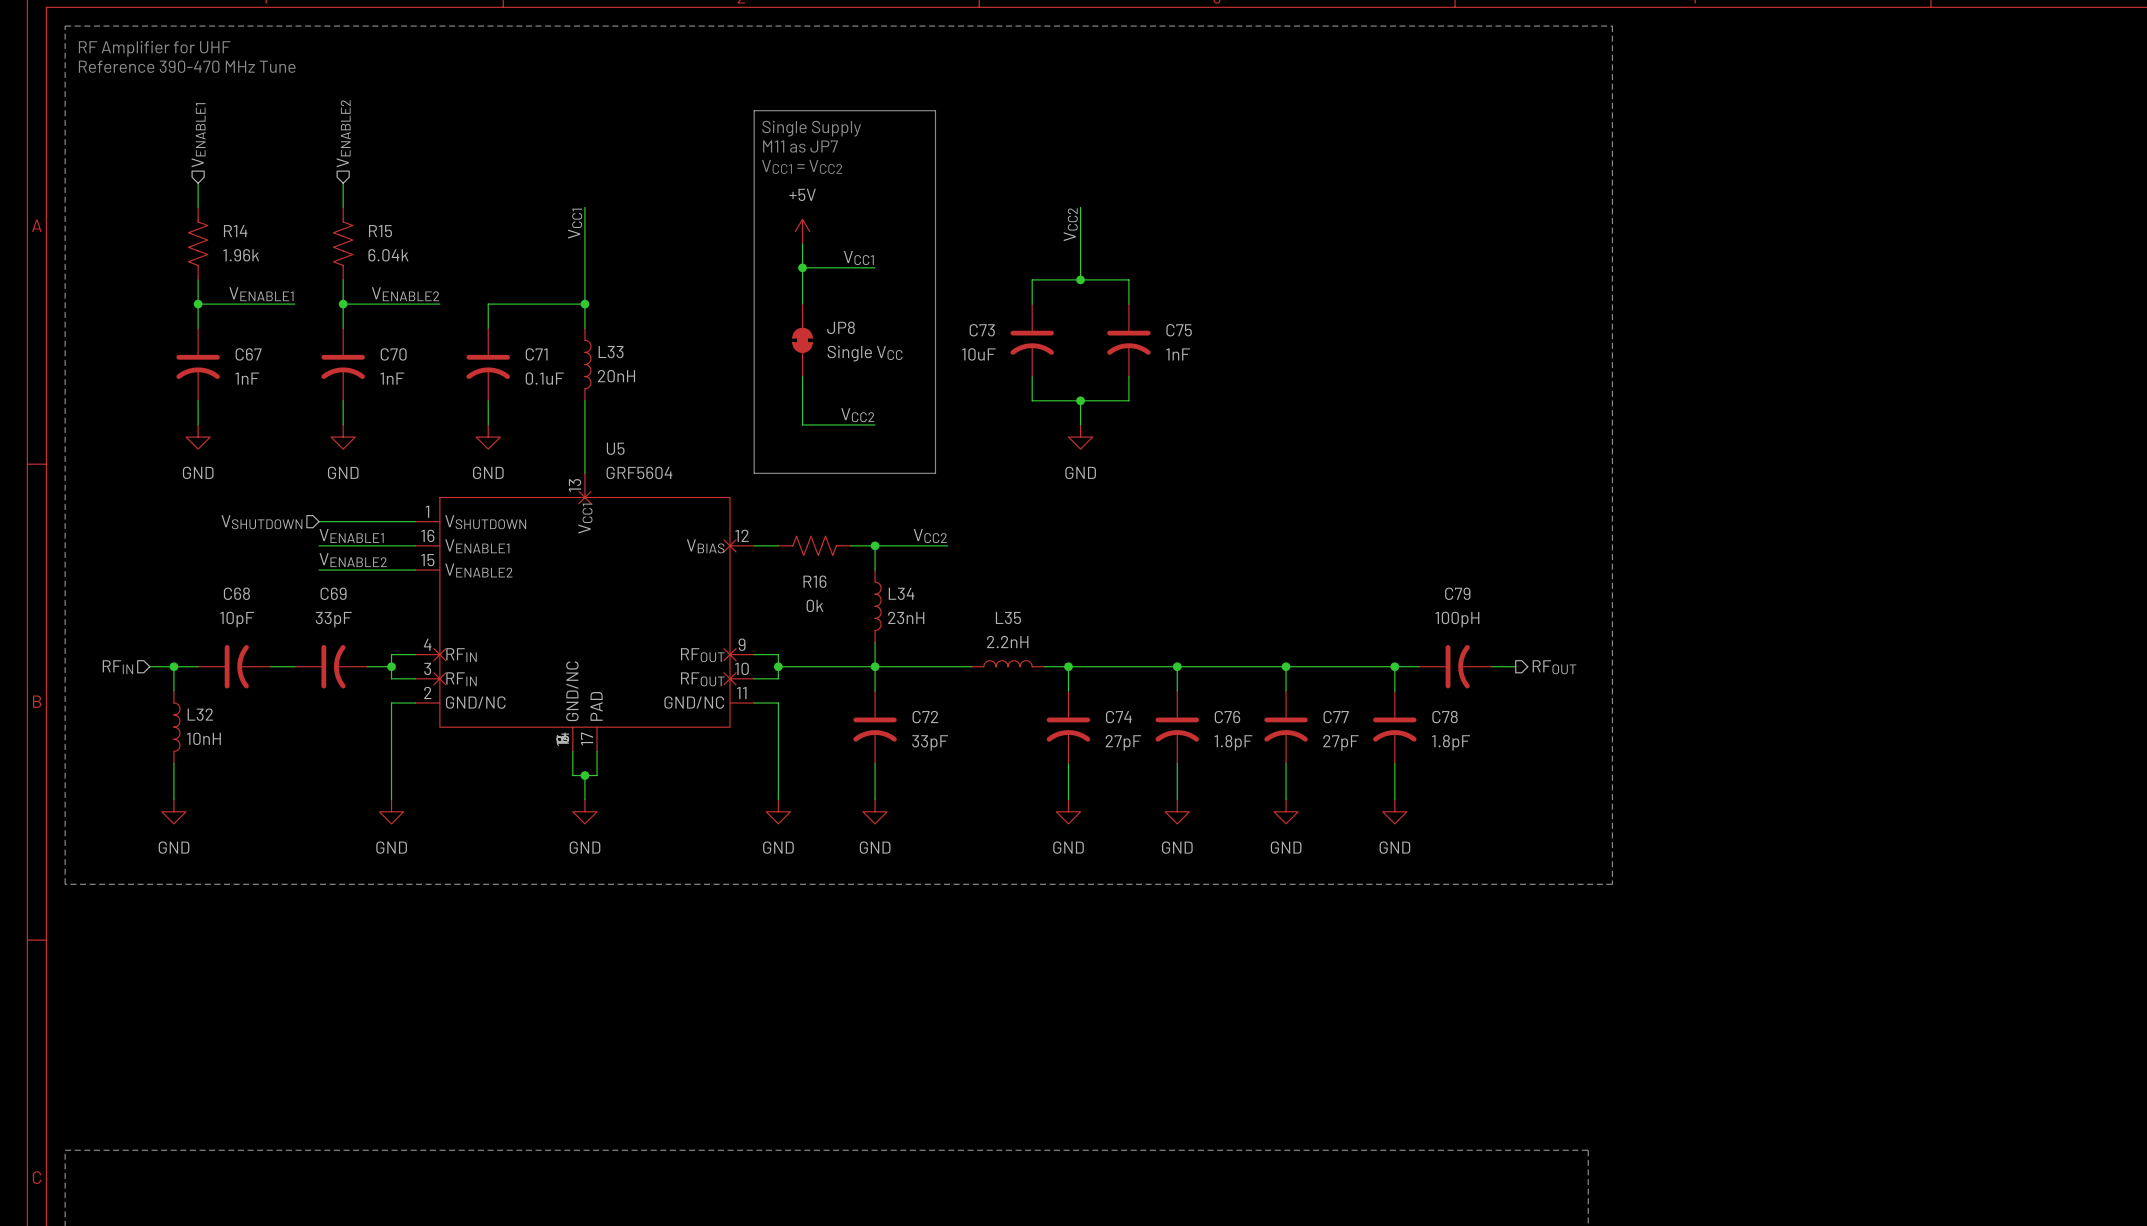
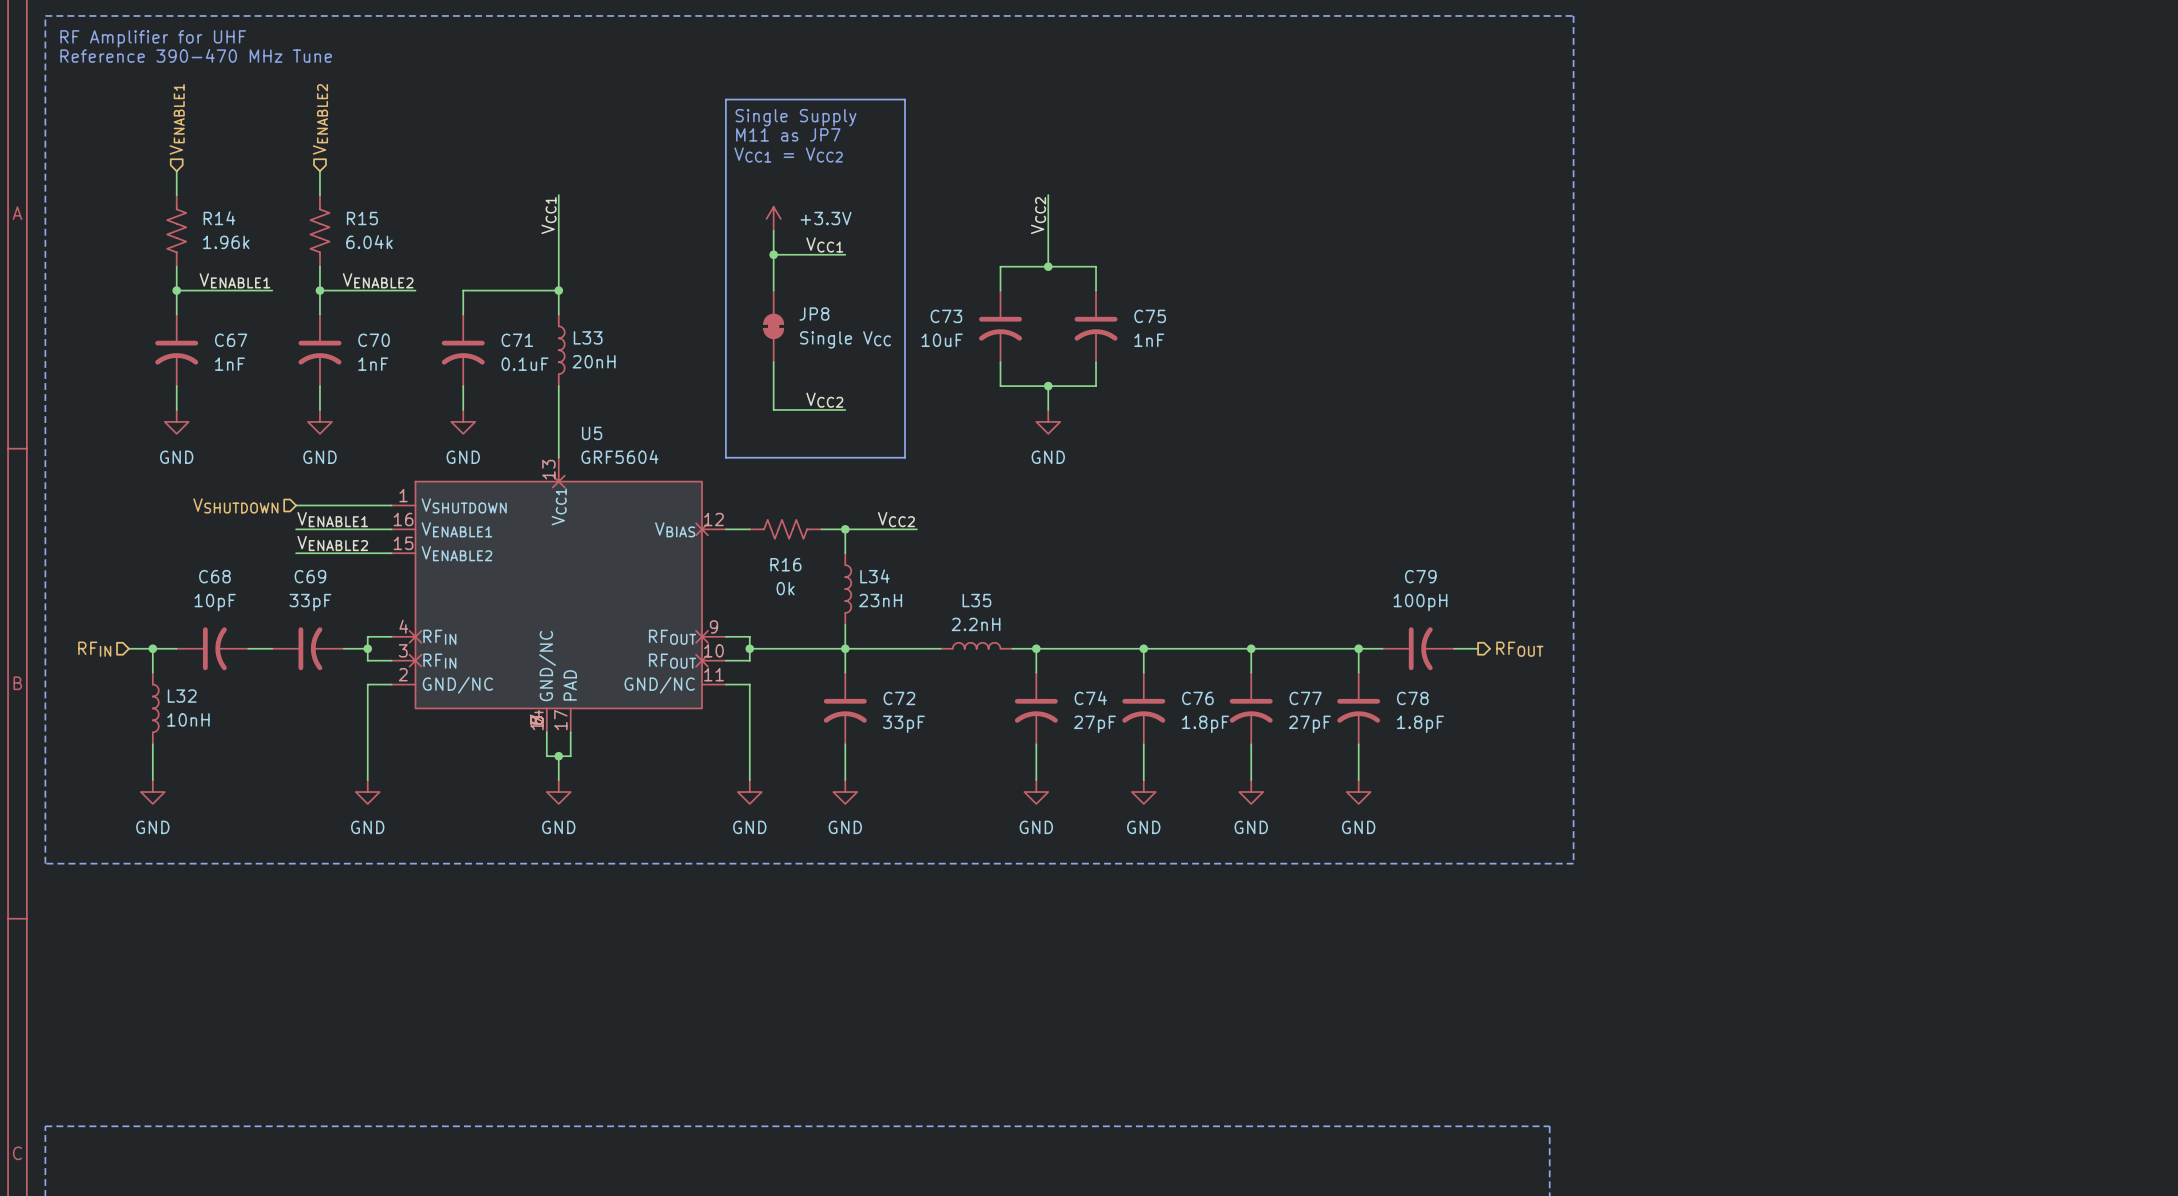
power symbol: +5V (802, 231) -> +3.3V (773, 218)

